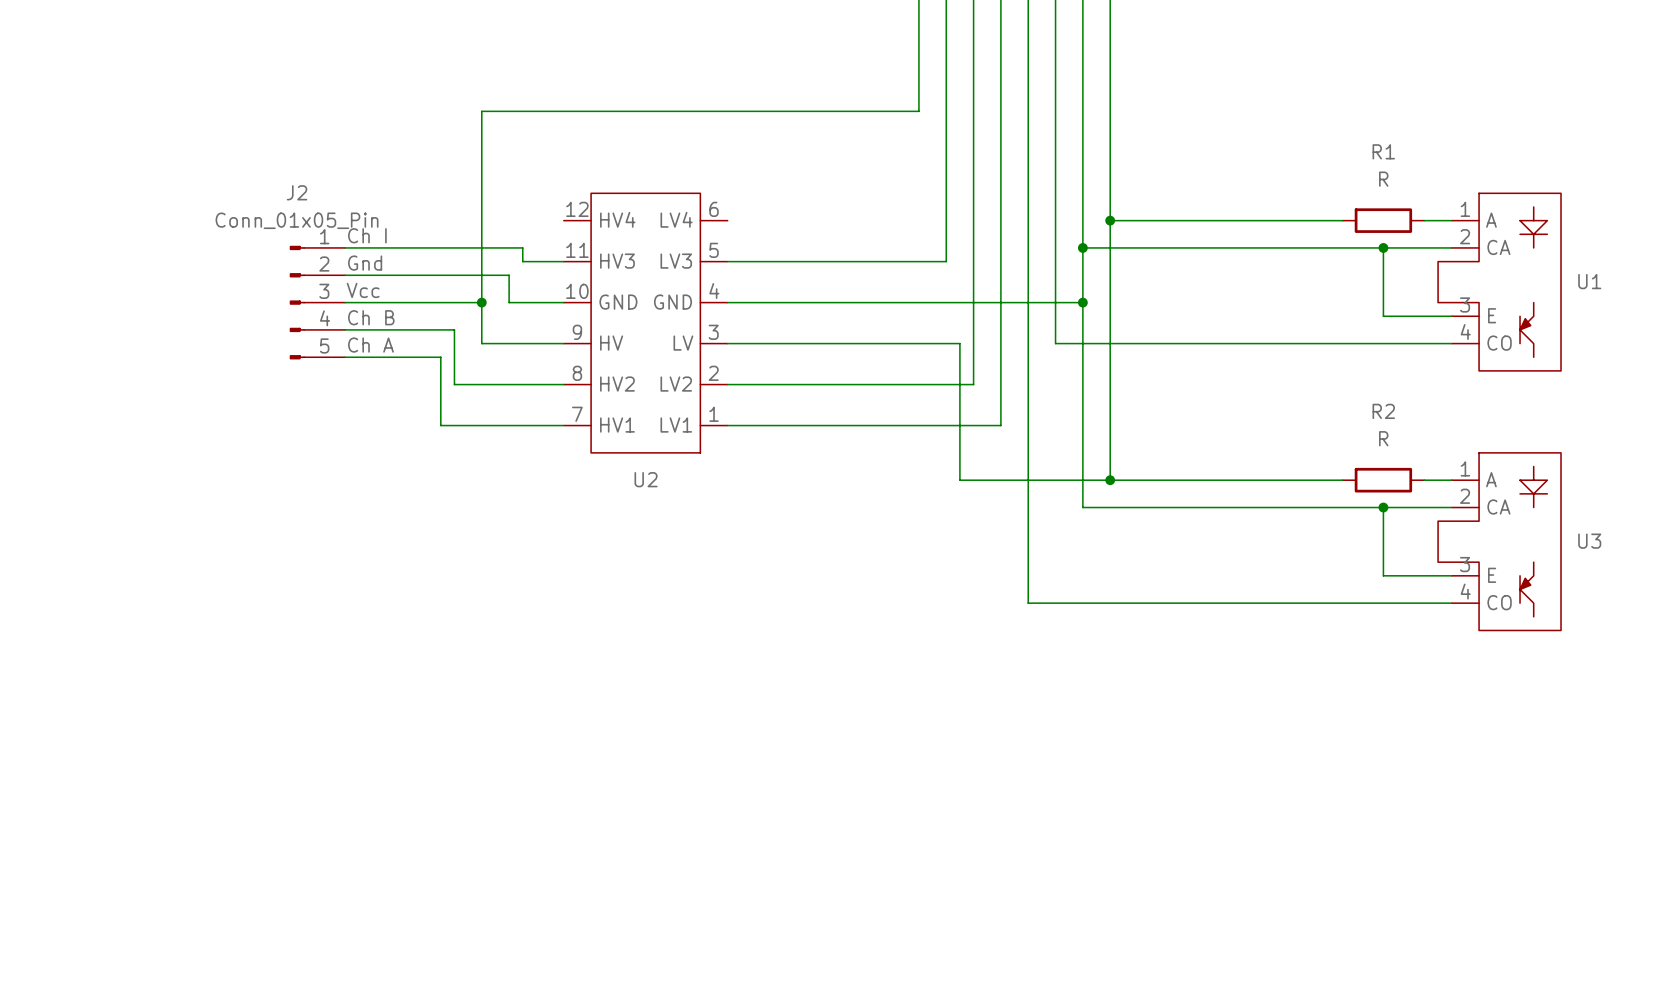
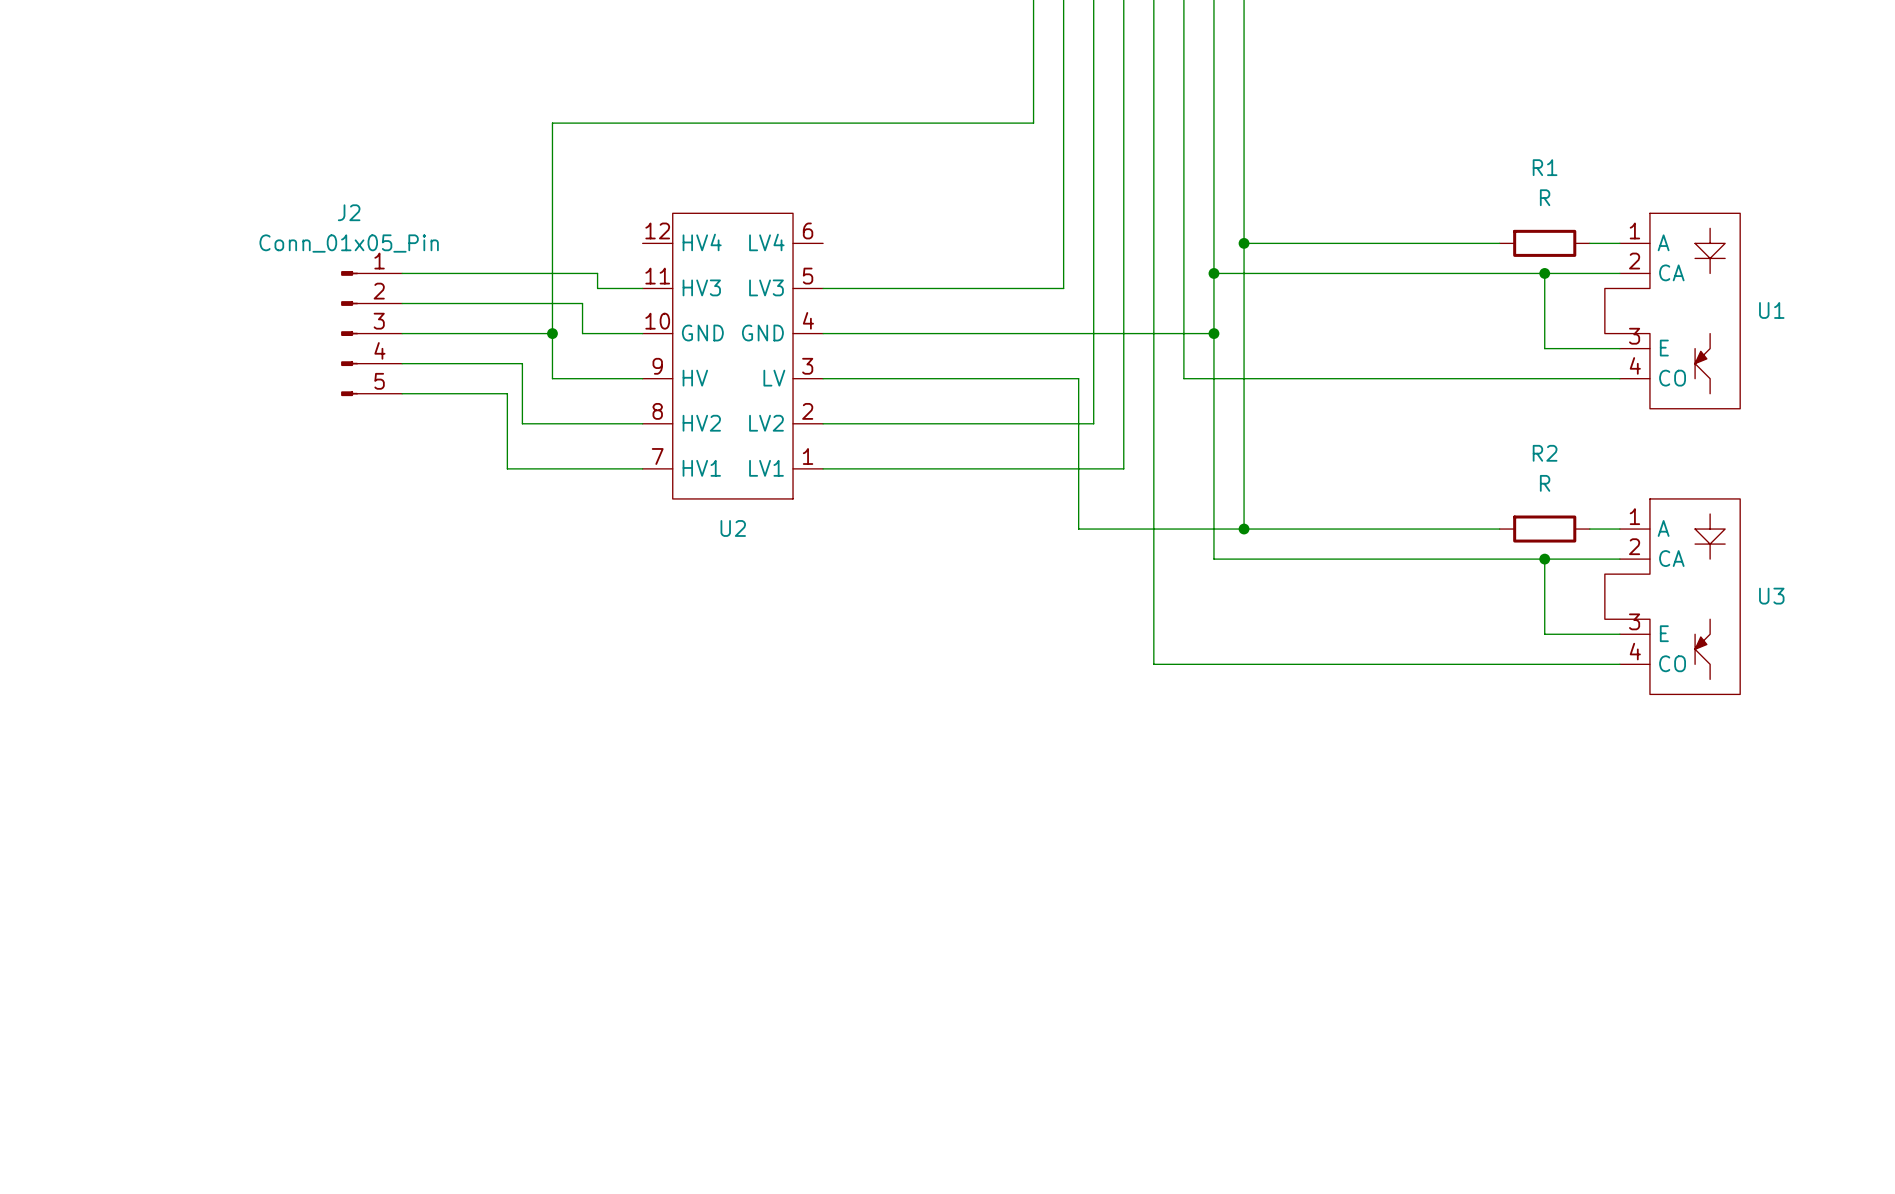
label: Ch I (367, 235) -> none
label: Gnd (365, 263) -> none
label: Vcc (363, 290) -> none
label: Ch B (371, 317) -> none
label: Ch A (370, 345) -> none

